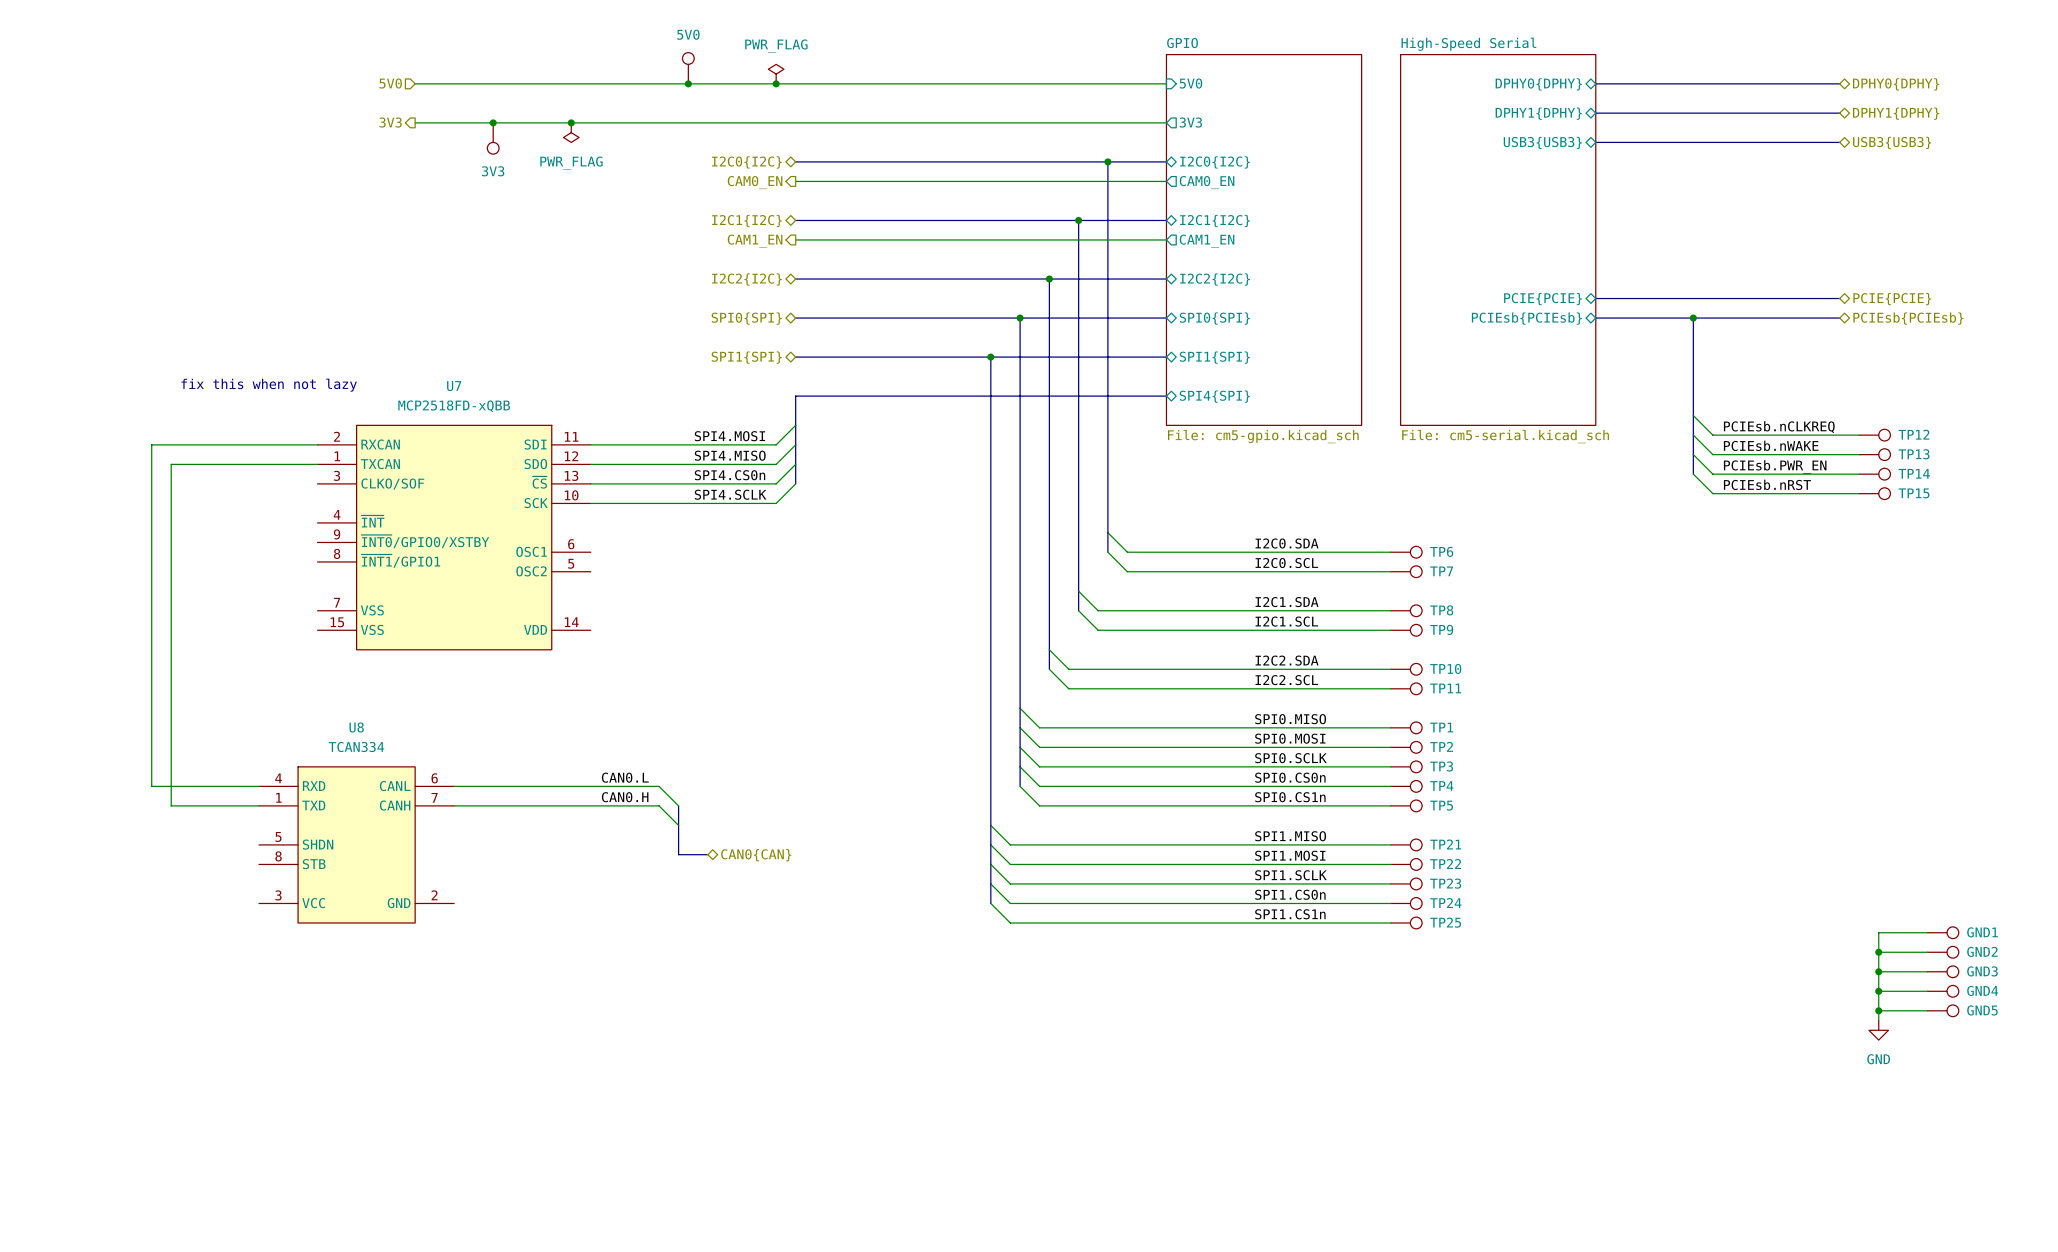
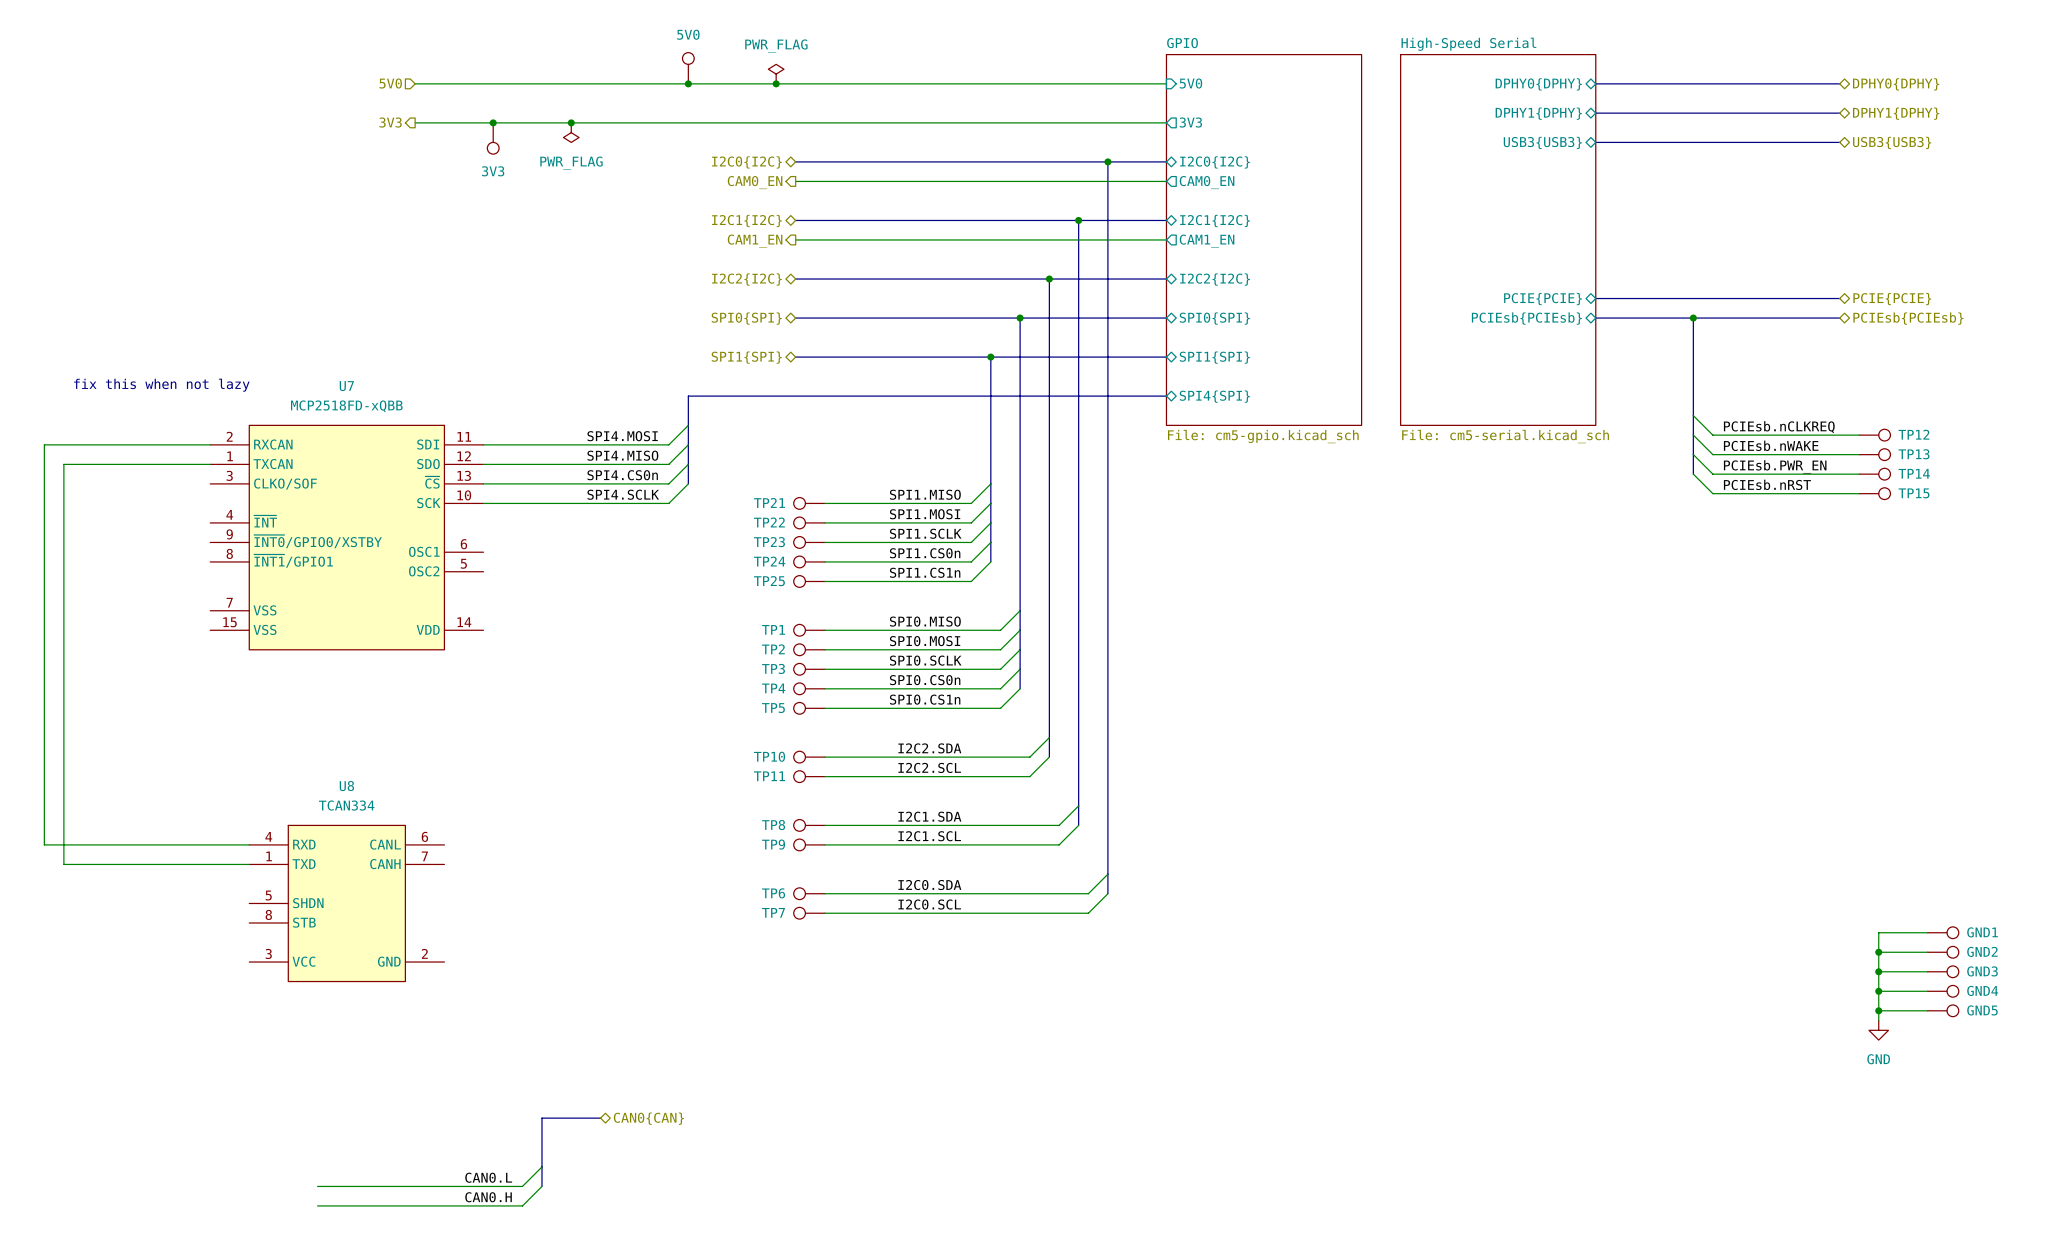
text position: fix this when not lazy (269, 385) -> fix this when not lazy (161, 385)
bus: (795, 396) (795, 483) -> (795, 396) (688, 396) (688, 483)
wire: (795, 425) (776, 444) (668, 444) -> (688, 425) (668, 444)
label position: SPI4.MOSI (729, 436) -> SPI4.MOSI (622, 436)
wire: (151, 444) (151, 786) (259, 786) -> (151, 444) (44, 444) (44, 844) (249, 844)
wire: (795, 444) (776, 464) (668, 464) -> (688, 444) (668, 464)
label position: SPI4.MISO (730, 455) -> SPI4.MISO (622, 455)
wire: (171, 464) (171, 805) (259, 805) -> (171, 464) (63, 464) (63, 864) (249, 864)
wire: (795, 464) (776, 483) (668, 483) -> (688, 464) (668, 483)
label position: SPI4.CS0n (730, 475) -> SPI4.CS0n (622, 475)
wire: (795, 483) (776, 503) (668, 503) -> (688, 483) (668, 503)
wire: none -> (990, 483) (971, 503) (824, 503)
label position: SPI4.SCLK (730, 494) -> SPI4.SCLK (623, 494)
label: none -> SPI1.MISO (925, 494)
wire: none -> (990, 503) (971, 522) (824, 522)
label: none -> SPI1.MOSI (925, 514)
wire: none -> (990, 522) (971, 542) (824, 542)
wire: (1107, 532) (1127, 552) (1390, 552) -> none
label: none -> SPI1.SCLK (925, 533)
U7 position: (454, 537) -> (346, 537)
wire: none -> (990, 542) (971, 561) (824, 561)
label: I2C0.SDA (1287, 543) -> none
wire: (1107, 552) (1127, 571) (1390, 571) -> none
TP6 position: (1406, 552) -> (809, 893)
TP6 rotation: 0° (1416, 552) -> 180° (799, 893)
label: none -> SPI1.CS0n (925, 553)
wire: none -> (990, 561) (971, 581) (824, 581)
bus: (990, 561) (990, 903) -> (1107, 552) (1107, 893)
label: I2C0.SCL (1286, 563) -> none
TP7 position: (1406, 571) -> (809, 913)
TP7 rotation: 0° (1416, 571) -> 180° (799, 913)
label: none -> SPI1.CS1n (925, 572)
wire: (1078, 591) (1098, 610) (1390, 610) -> none
label: I2C1.SDA (1287, 602) -> none
wire: none -> (1020, 610) (1000, 630) (824, 630)
wire: (1078, 610) (1098, 630) (1390, 630) -> none
bus: none -> (1078, 610) (1078, 825)
TP8 position: (1406, 610) -> (809, 825)
TP8 rotation: 0° (1416, 610) -> 180° (799, 825)
label: none -> SPI0.MISO (925, 621)
label: I2C1.SCL (1286, 621) -> none
wire: none -> (1020, 630) (1000, 649) (824, 649)
TP9 position: (1406, 630) -> (809, 844)
TP9 rotation: 0° (1416, 630) -> 180° (799, 844)
label: none -> SPI0.MOSI (925, 641)
wire: none -> (1020, 649) (1000, 669) (824, 669)
wire: (1049, 649) (1068, 669) (1390, 669) -> none
label: none -> SPI0.SCLK (925, 660)
label: I2C2.SDA (1287, 660) -> none
wire: none -> (1020, 669) (1000, 688) (824, 688)
wire: (1049, 669) (1068, 688) (1390, 688) -> none
bus: none -> (1049, 669) (1049, 757)
TP10 position: (1406, 669) -> (809, 757)
TP10 rotation: 0° (1416, 669) -> 180° (799, 757)
label: none -> SPI0.CS0n (925, 680)
label: I2C2.SCL (1286, 680) -> none
wire: none -> (1020, 688) (1000, 708) (824, 708)
bus: (1020, 688) (1020, 786) -> none
TP11 position: (1406, 688) -> (809, 776)
TP11 rotation: 0° (1416, 688) -> 180° (799, 776)
label: none -> SPI0.CS1n (925, 699)
wire: (1020, 708) (1039, 727) (1390, 727) -> none
label: SPI0.MISO (1290, 719) -> none
wire: (1020, 727) (1039, 747) (1390, 747) -> none
TP1 position: (1406, 727) -> (809, 630)
TP1 rotation: 0° (1416, 727) -> 180° (799, 630)
wire: none -> (1049, 737) (1029, 757) (824, 757)
label: SPI0.MOSI (1290, 738) -> none
wire: (1020, 747) (1039, 766) (1390, 766) -> none
TP2 position: (1406, 747) -> (809, 649)
TP2 rotation: 0° (1416, 747) -> 180° (799, 649)
label: none -> I2C2.SDA (929, 748)
wire: none -> (1049, 757) (1029, 776) (824, 776)
label: SPI0.SCLK (1290, 758) -> none
wire: (1020, 766) (1039, 786) (1390, 786) -> none
TP3 position: (1406, 766) -> (809, 669)
TP3 rotation: 0° (1416, 766) -> 180° (799, 669)
label: none -> I2C2.SCL (929, 767)
label: CAN0.L (625, 777) -> none
label: SPI0.CS0n (1290, 777) -> none
wire: (454, 786) (659, 786) (678, 805) -> none
wire: (1020, 786) (1039, 805) (1390, 805) -> none
TP4 position: (1406, 786) -> (809, 688)
TP4 rotation: 0° (1416, 786) -> 180° (799, 688)
label: CAN0.H (625, 797) -> none
label: SPI0.CS1n (1290, 797) -> none
wire: (454, 805) (659, 805) (678, 825) -> none
bus: (678, 805) (678, 854) (707, 854) -> none
wire: none -> (1078, 805) (1059, 825) (824, 825)
TP5 position: (1406, 805) -> (809, 708)
TP5 rotation: 0° (1416, 805) -> 180° (799, 708)
label: none -> I2C1.SDA (929, 816)
wire: (990, 825) (1010, 844) -> (824, 844) (1010, 844)
label: none -> I2C1.SCL (929, 836)
label: SPI1.MISO (1290, 836) -> none
U8 position: (356, 844) -> (346, 903)
wire: (990, 844) (1010, 864) (1390, 864) -> none
wire: (1059, 844) (1390, 844) -> (1059, 844) (1078, 825)
TP21 position: (1406, 844) -> (809, 503)
TP21 rotation: 0° (1416, 844) -> 180° (799, 503)
hierarchical label: CAN0{CAN} (756, 855) -> none
label: SPI1.MOSI (1290, 855) -> none
wire: (990, 864) (1010, 883) (1390, 883) -> none
TP22 position: (1406, 864) -> (809, 522)
TP22 rotation: 0° (1416, 864) -> 180° (799, 522)
wire: none -> (1107, 874) (1088, 893) (824, 893)
label: SPI1.SCLK (1290, 875) -> none
wire: (990, 883) (1010, 903) (1390, 903) -> none
TP23 position: (1406, 883) -> (809, 542)
TP23 rotation: 0° (1416, 883) -> 180° (799, 542)
label: none -> I2C0.SDA (929, 885)
wire: none -> (1107, 893) (1088, 913) (824, 913)
label: SPI1.CS0n (1290, 894) -> none
wire: (990, 903) (1010, 922) (1390, 922) -> none
TP24 position: (1406, 903) -> (809, 561)
TP24 rotation: 0° (1416, 903) -> 180° (799, 561)
label: none -> I2C0.SCL (929, 904)
label: SPI1.CS1n (1290, 914) -> none
TP25 position: (1406, 922) -> (809, 581)
TP25 rotation: 0° (1416, 922) -> 180° (799, 581)
bus: none -> (600, 1118) (541, 1118) (541, 1186)
hierarchical label: none -> CAN0{CAN} (648, 1118)
wire: none -> (541, 1166) (522, 1186) (317, 1186)
label: none -> CAN0.L (488, 1177)
wire: none -> (541, 1186) (522, 1205) (317, 1205)
label: none -> CAN0.H (488, 1197)

